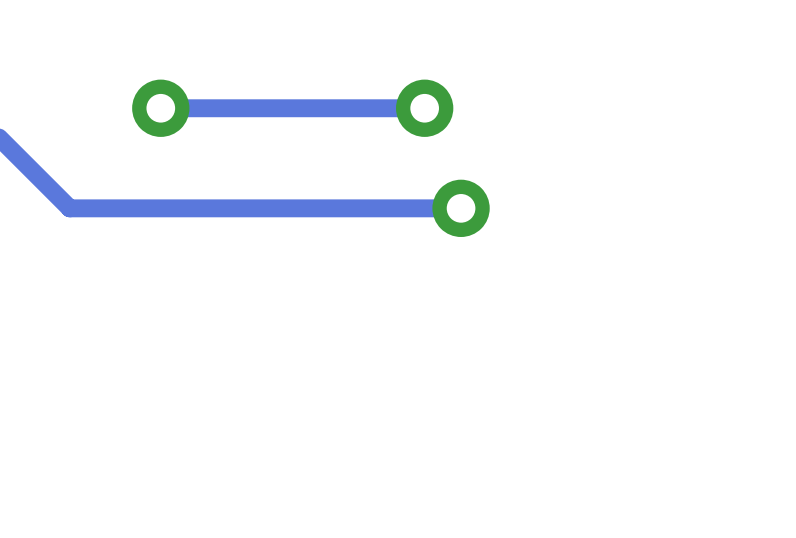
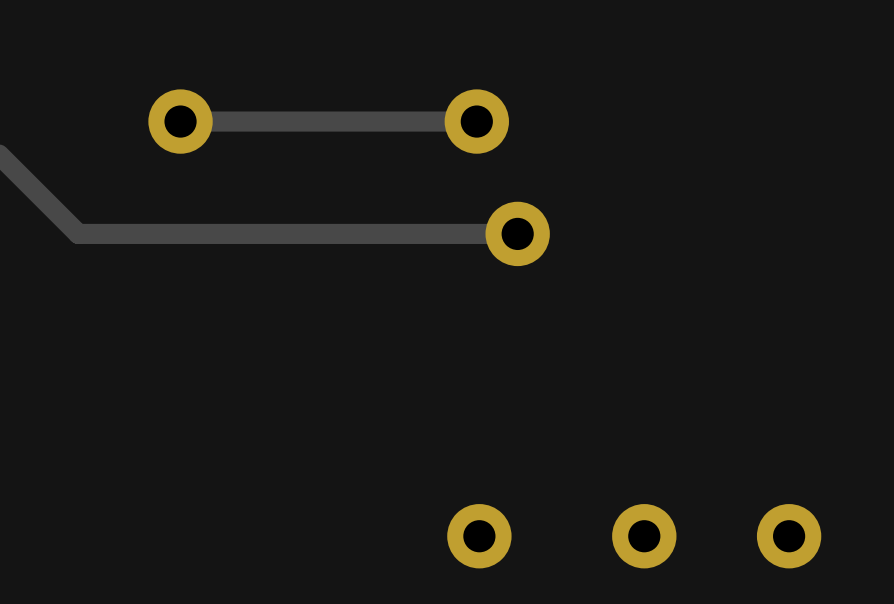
via: none -> (479, 536)
via: none -> (644, 536)
via: none -> (789, 536)

